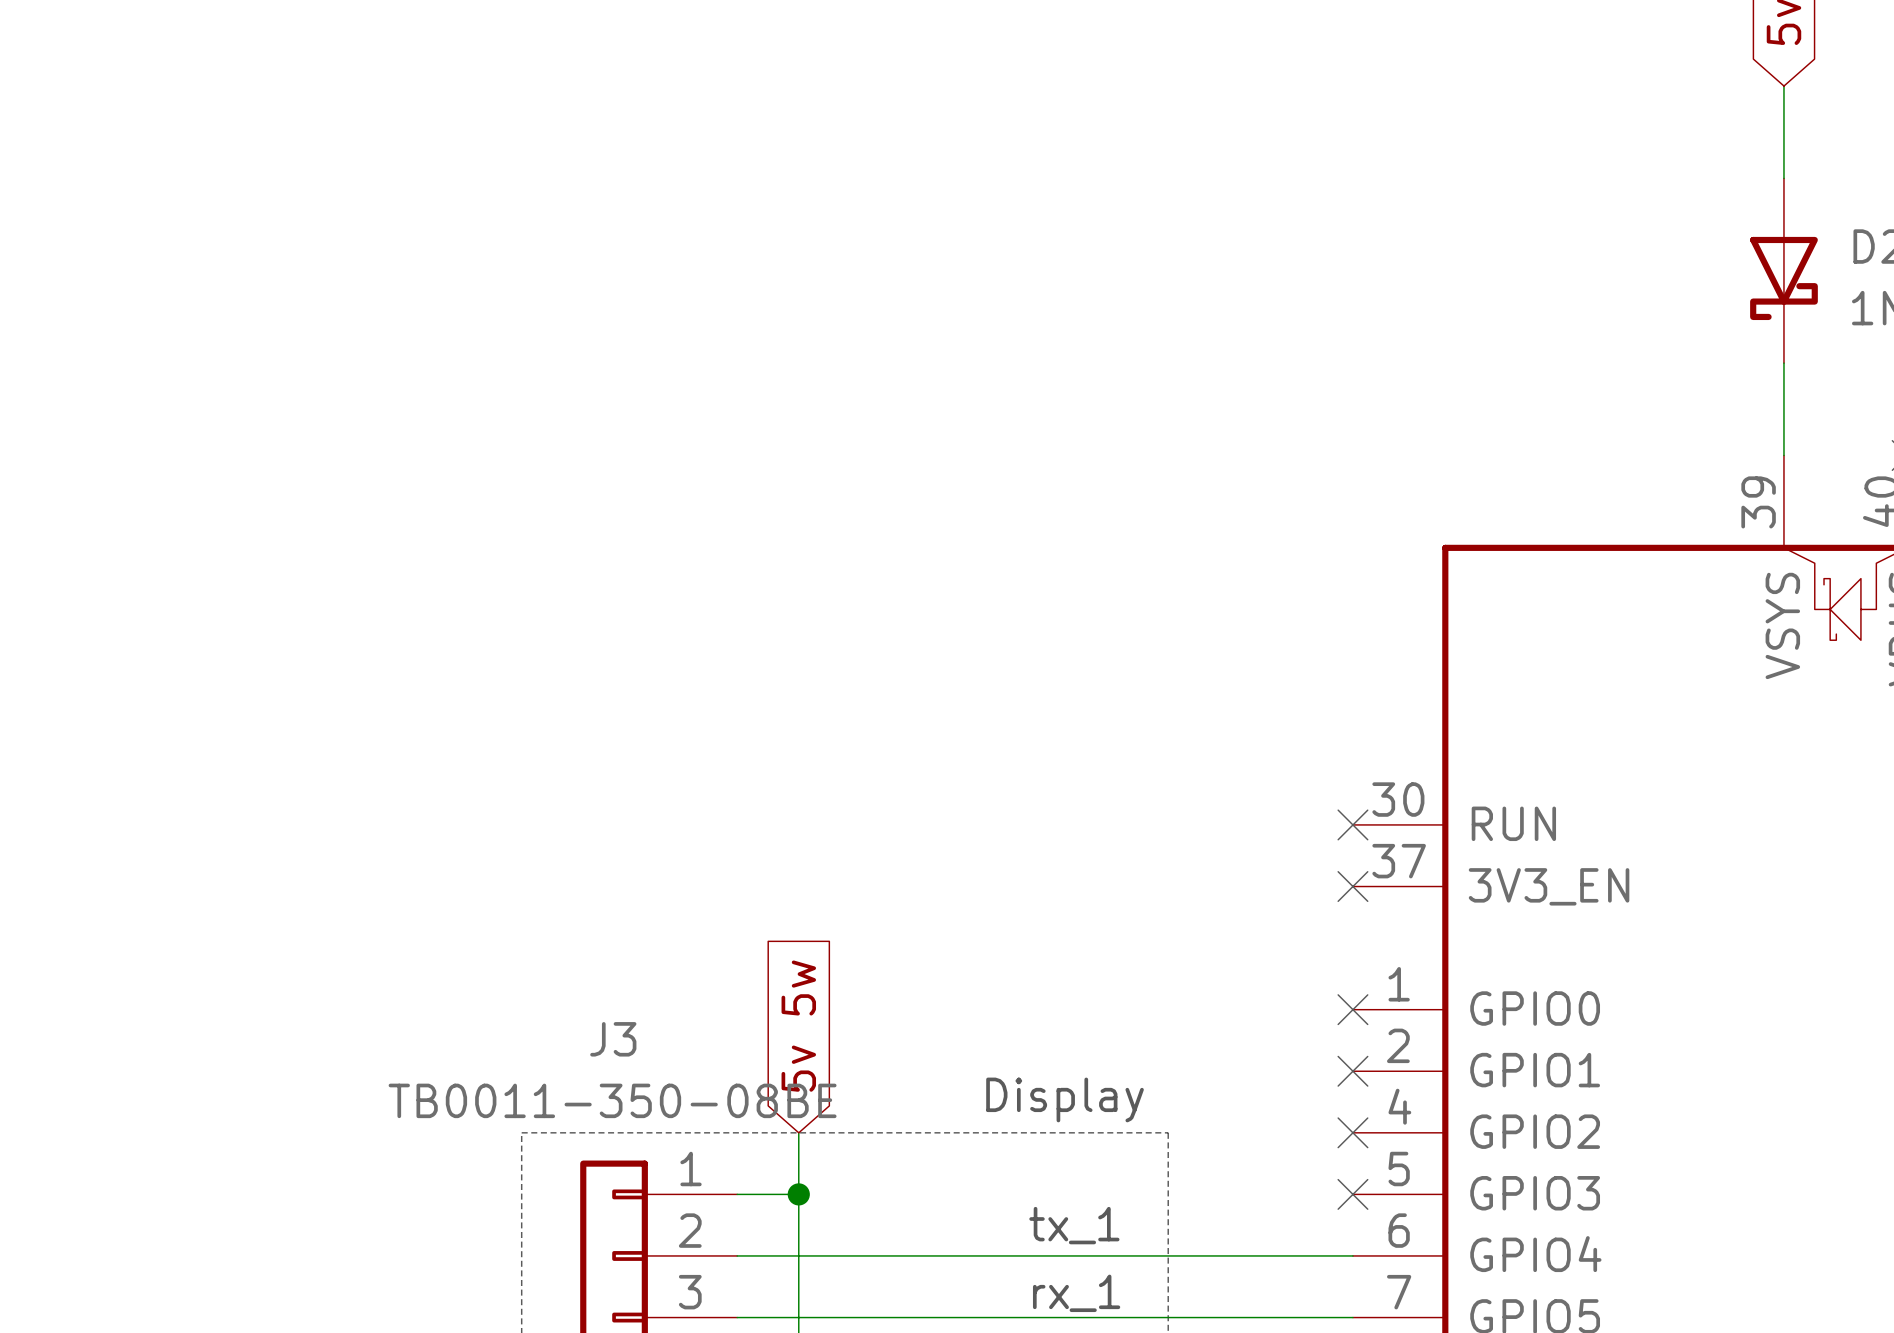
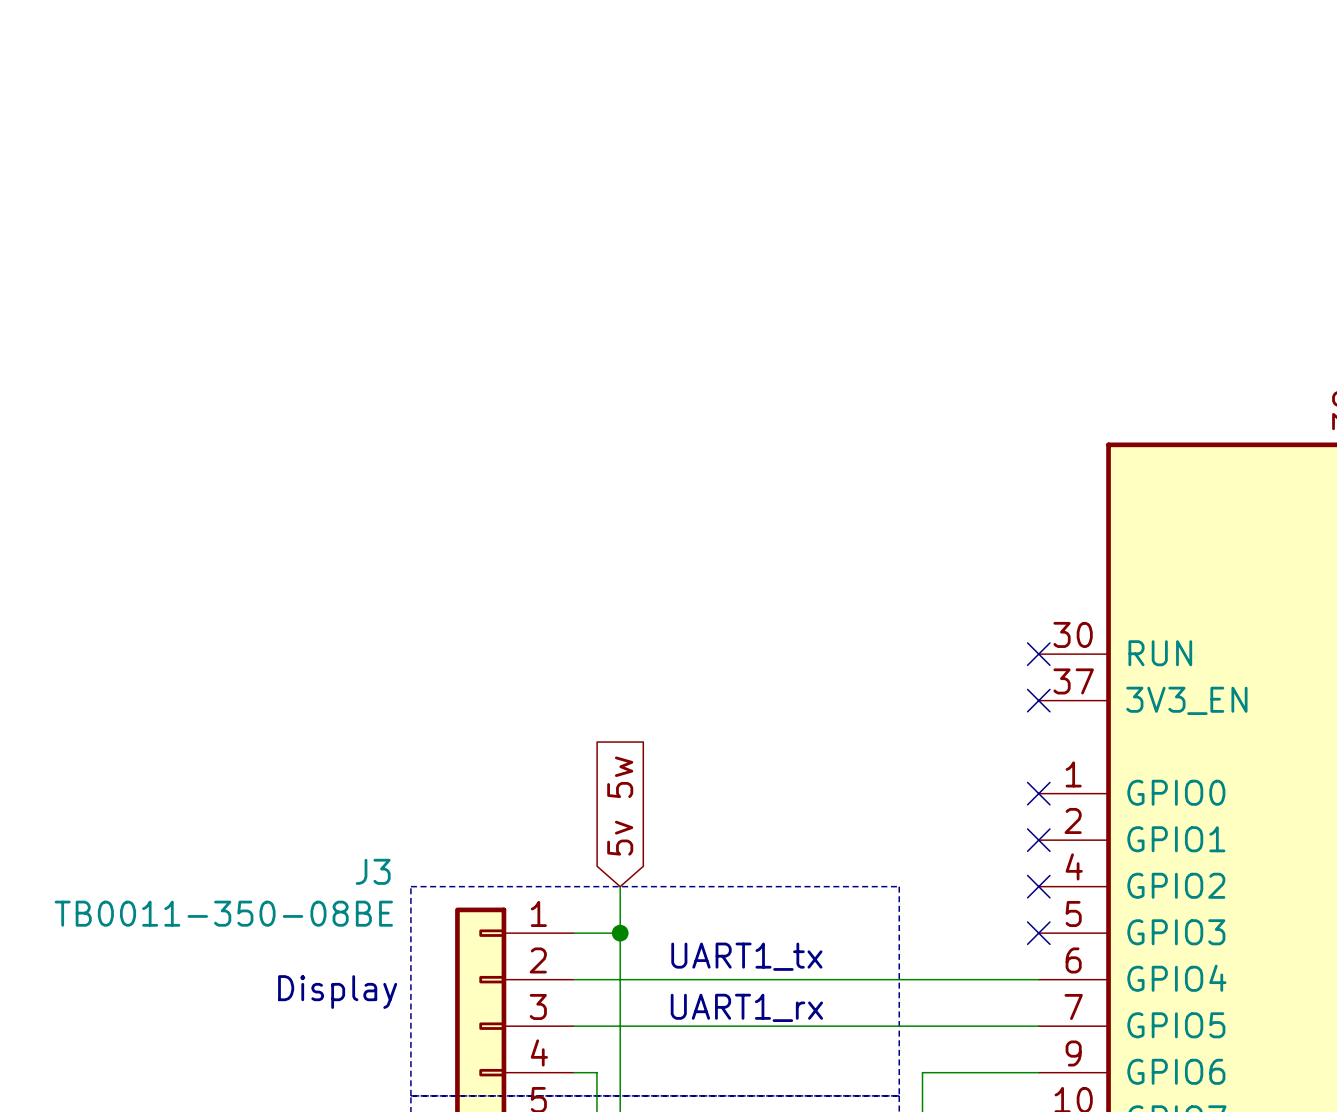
J3 name position: J3 (613, 1039) -> J3 (373, 871)
text: Display (1065, 1099) -> none
J3 value position: TB0011-350-08BE (612, 1100) -> TB0011-350-08BE (223, 913)
text: none -> UART1_tx (746, 956)
text: tx_1 (1074, 1225) -> none
text: none -> Display (337, 992)
text: none -> UART1_rx (746, 1007)
text: rx_1 (1076, 1293) -> none

